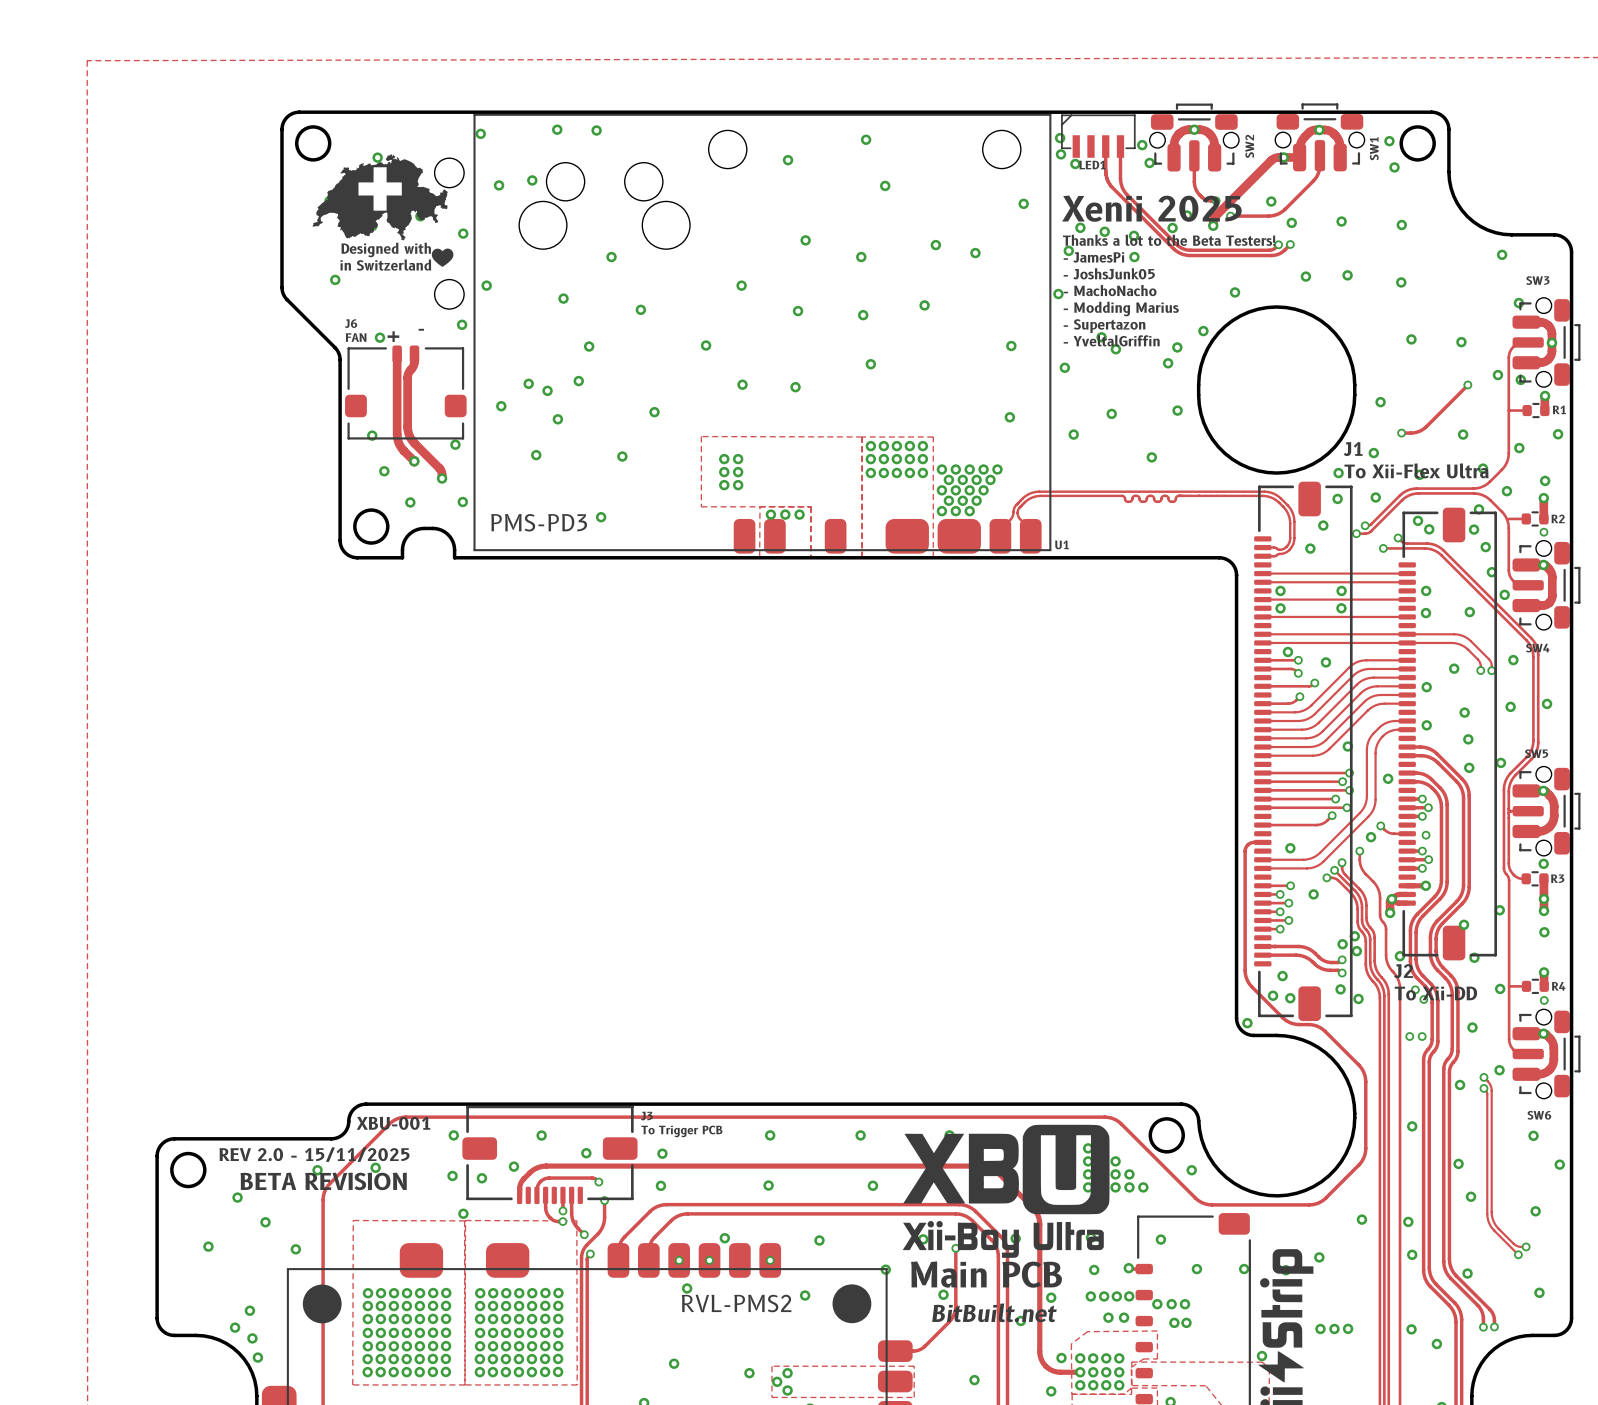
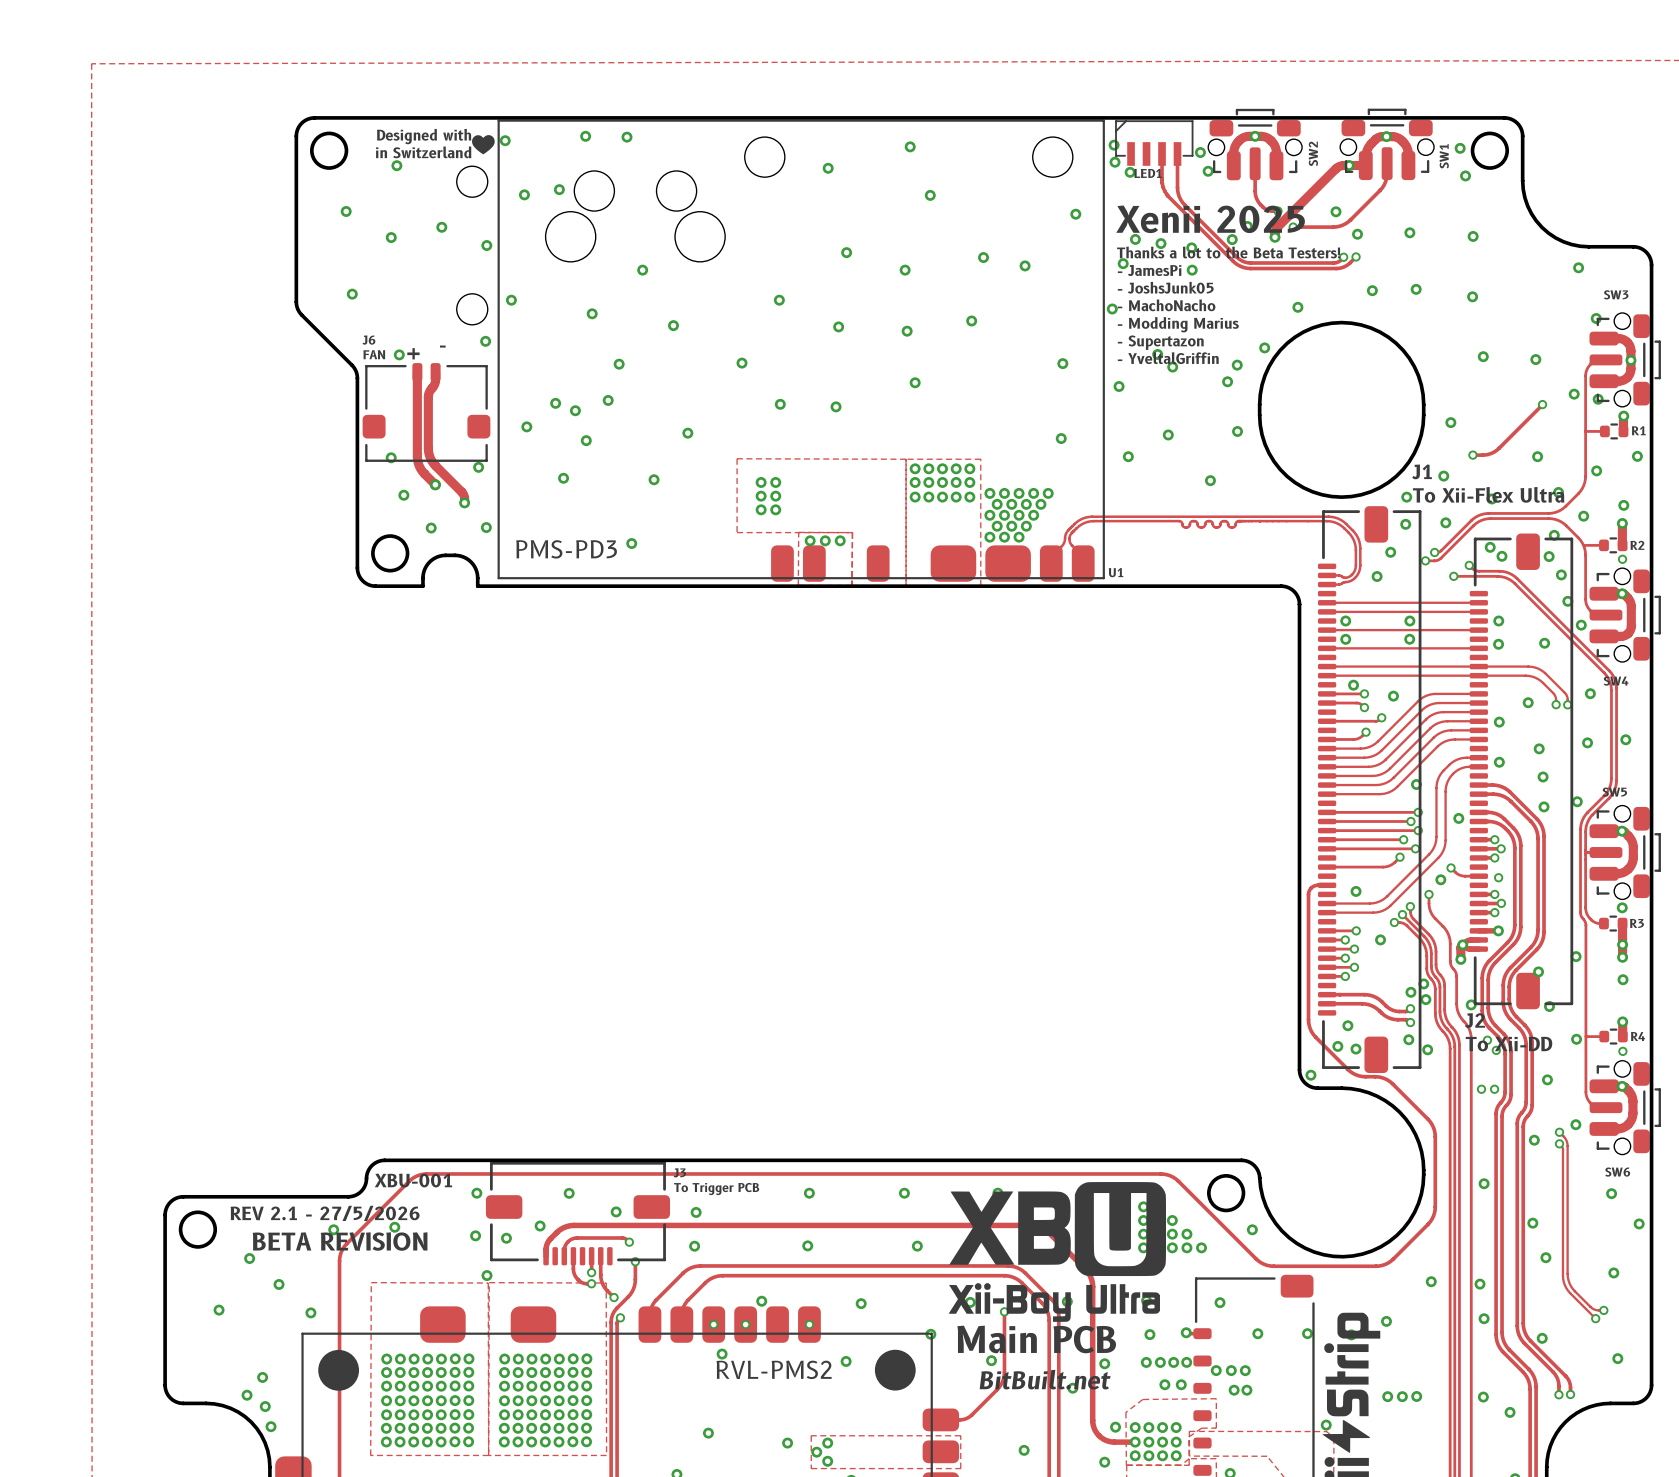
drawing: [312, 154, 448, 241] -> none
text position: Designed with (386, 249) -> Designed with (424, 136)
drawing position: (442, 257) -> (483, 144)
text position: in Switzerland (385, 265) -> in Switzerland (423, 152)
text: REV 2.0 - 15/11/2025 (314, 1154) -> REV 2.1 - 27/5/2026 (325, 1213)

